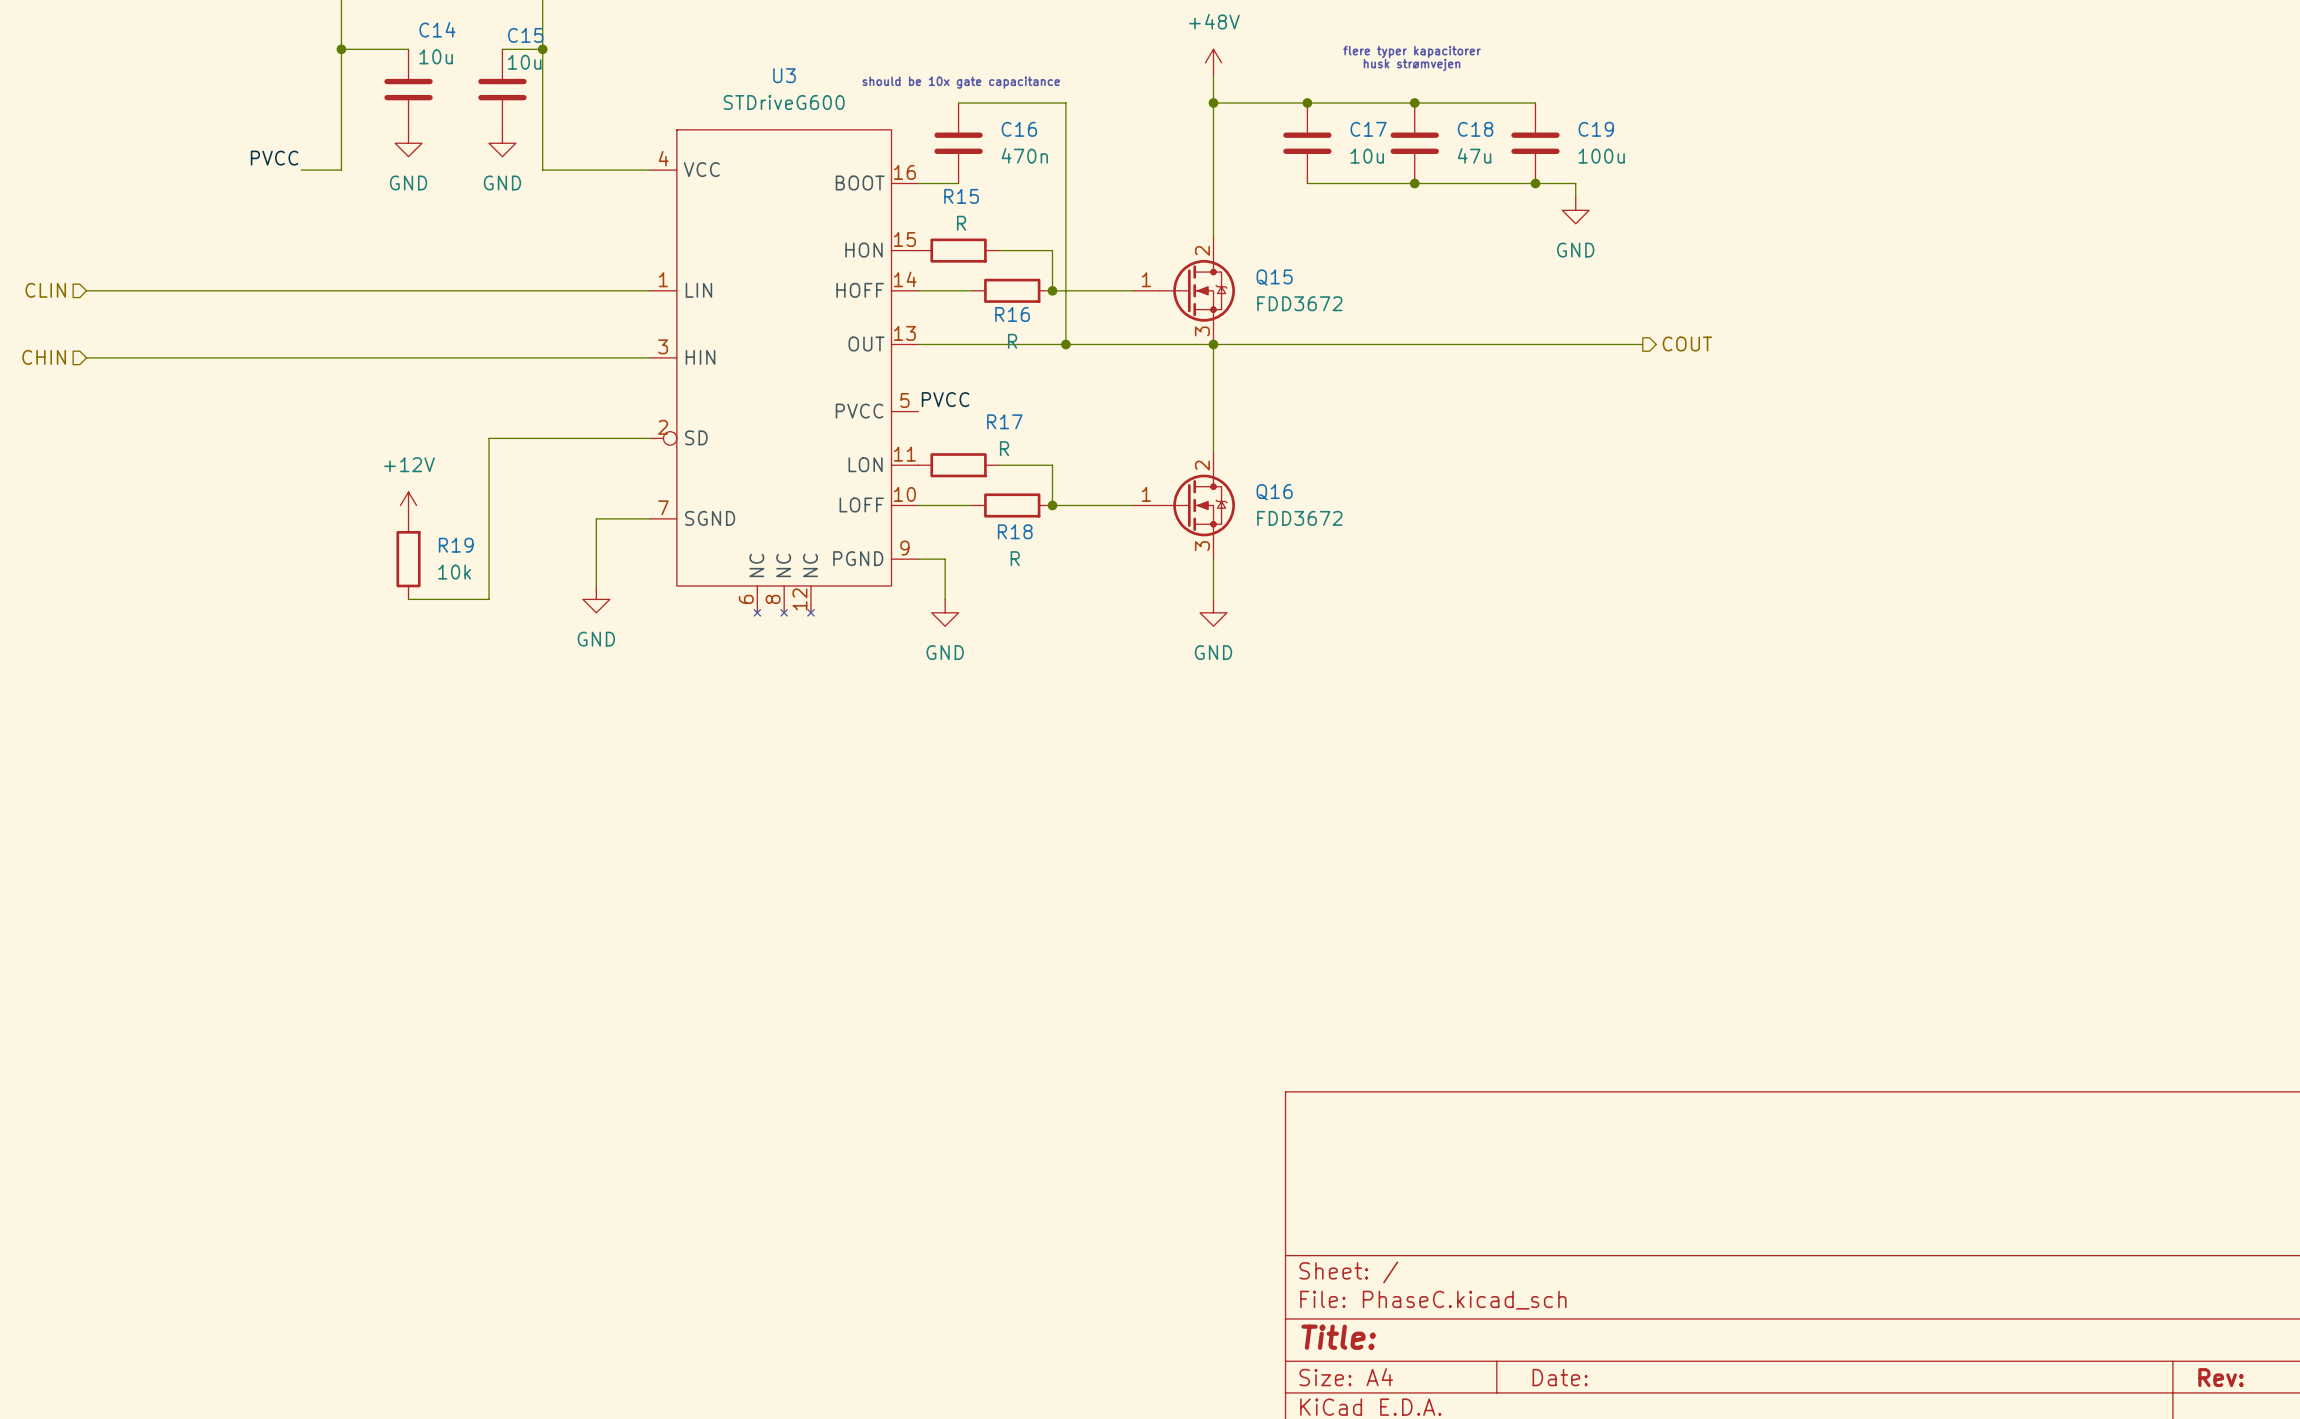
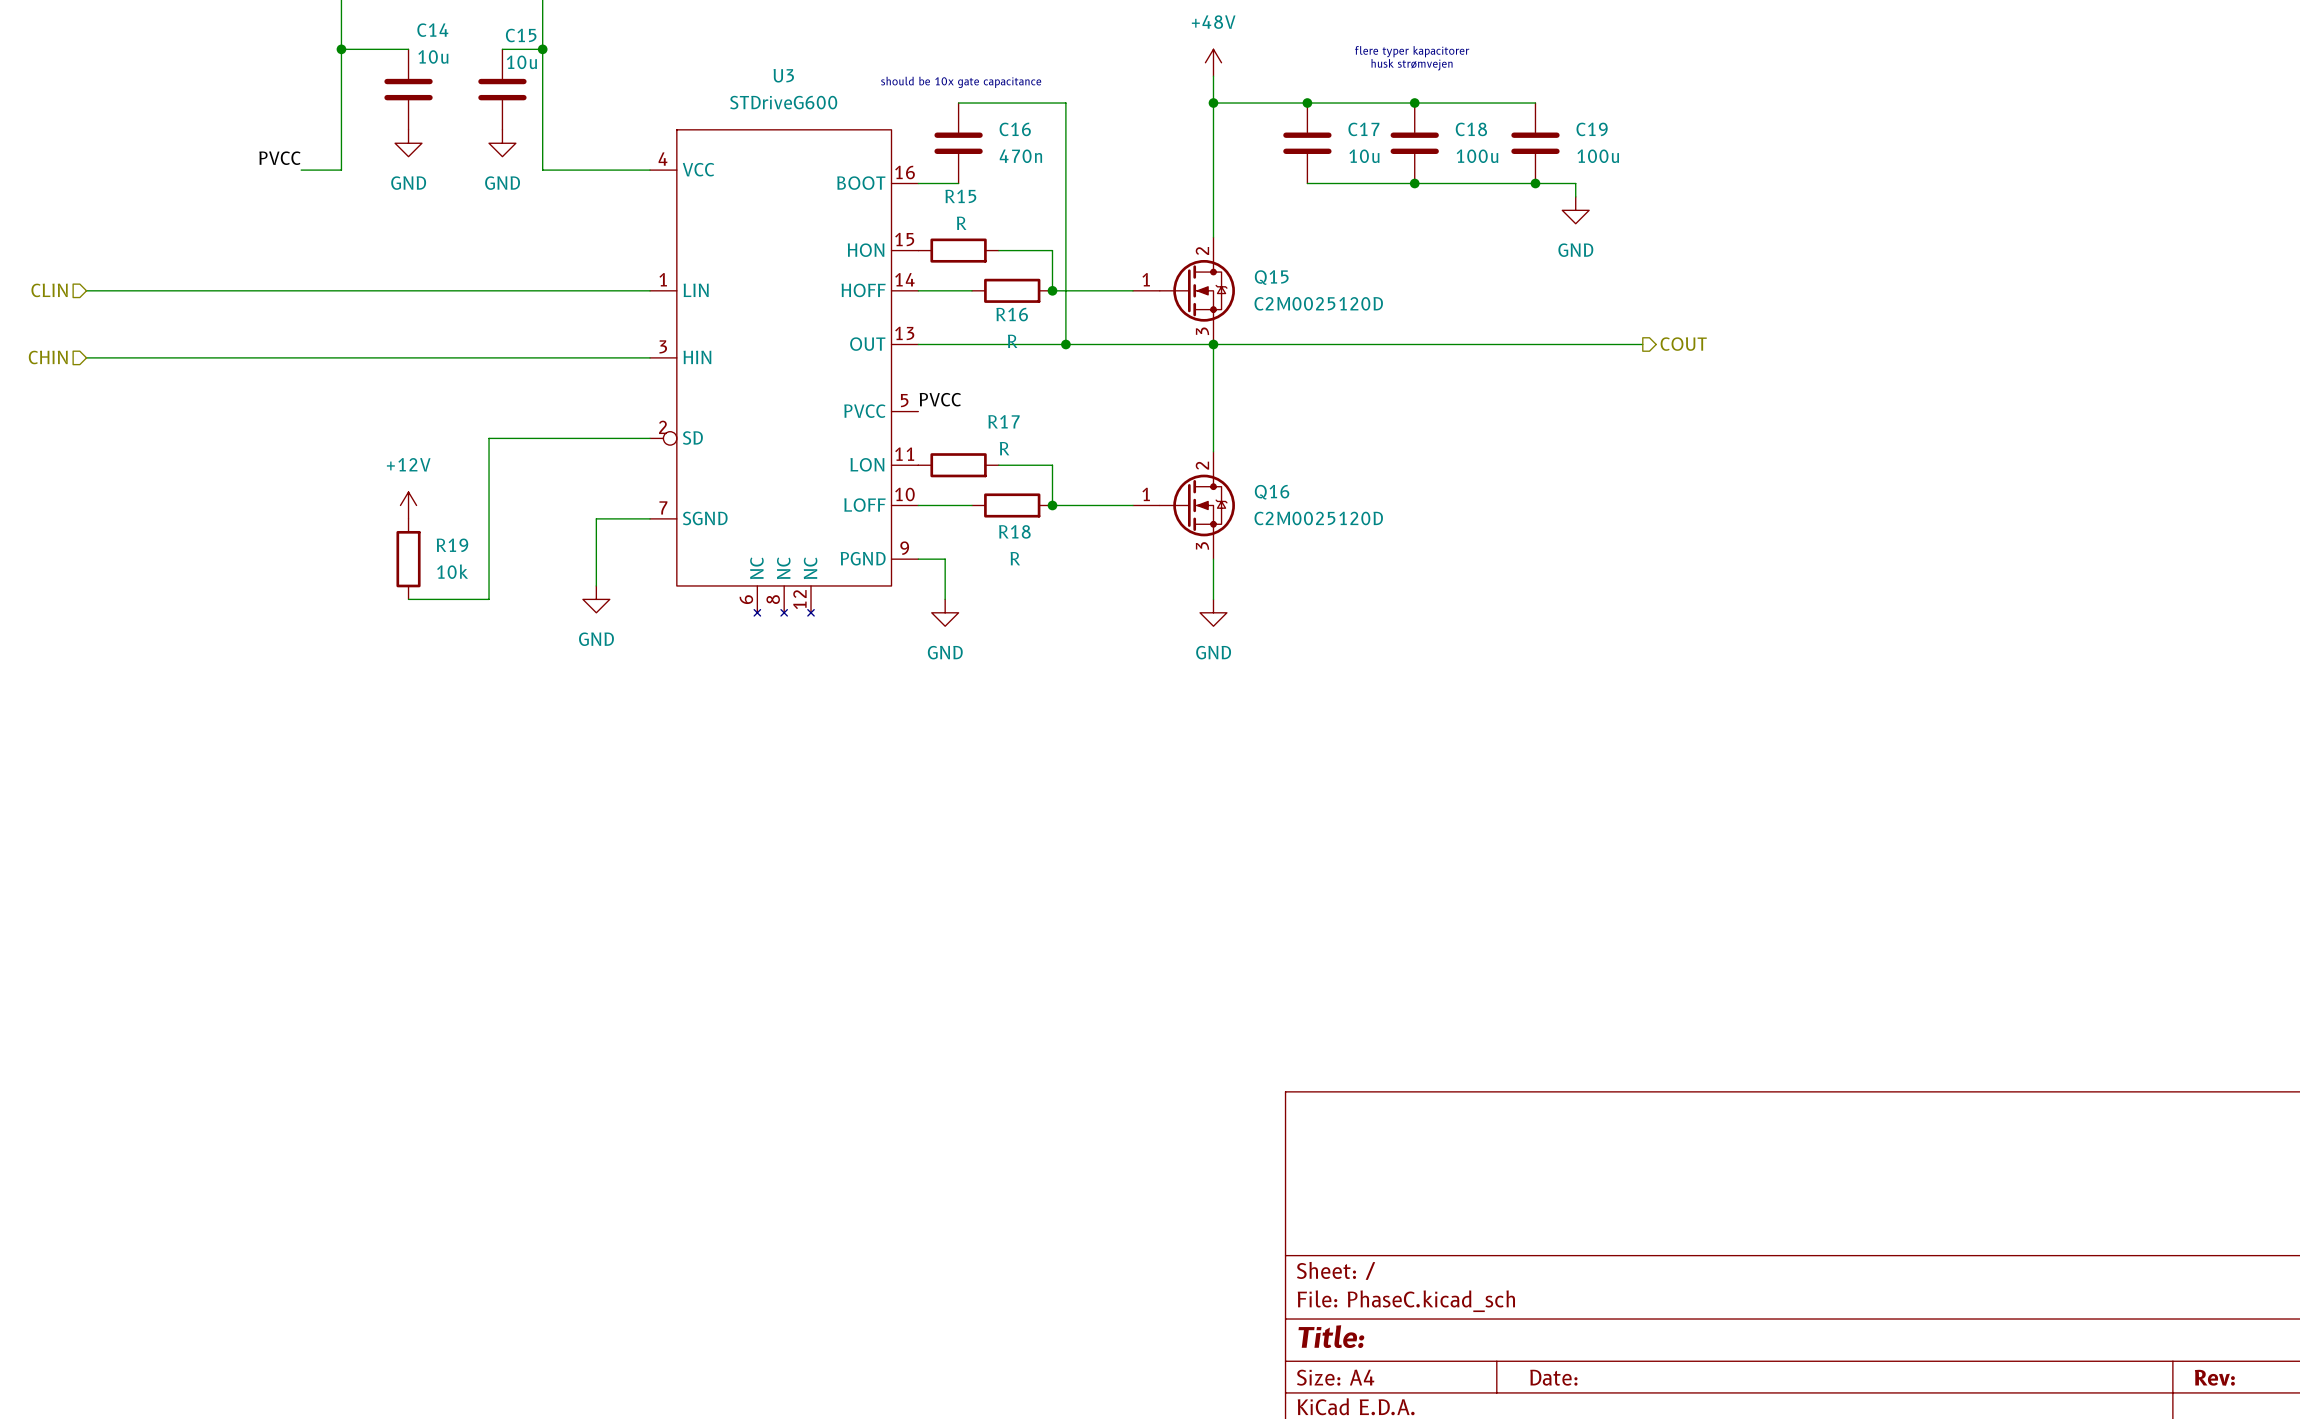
C18 value: 47u (1474, 155) -> 100u (1477, 156)
Q15 value: FDD3672 (1299, 303) -> C2M0025120D (1318, 303)
Q16 value: FDD3672 (1299, 518) -> C2M0025120D (1318, 518)

